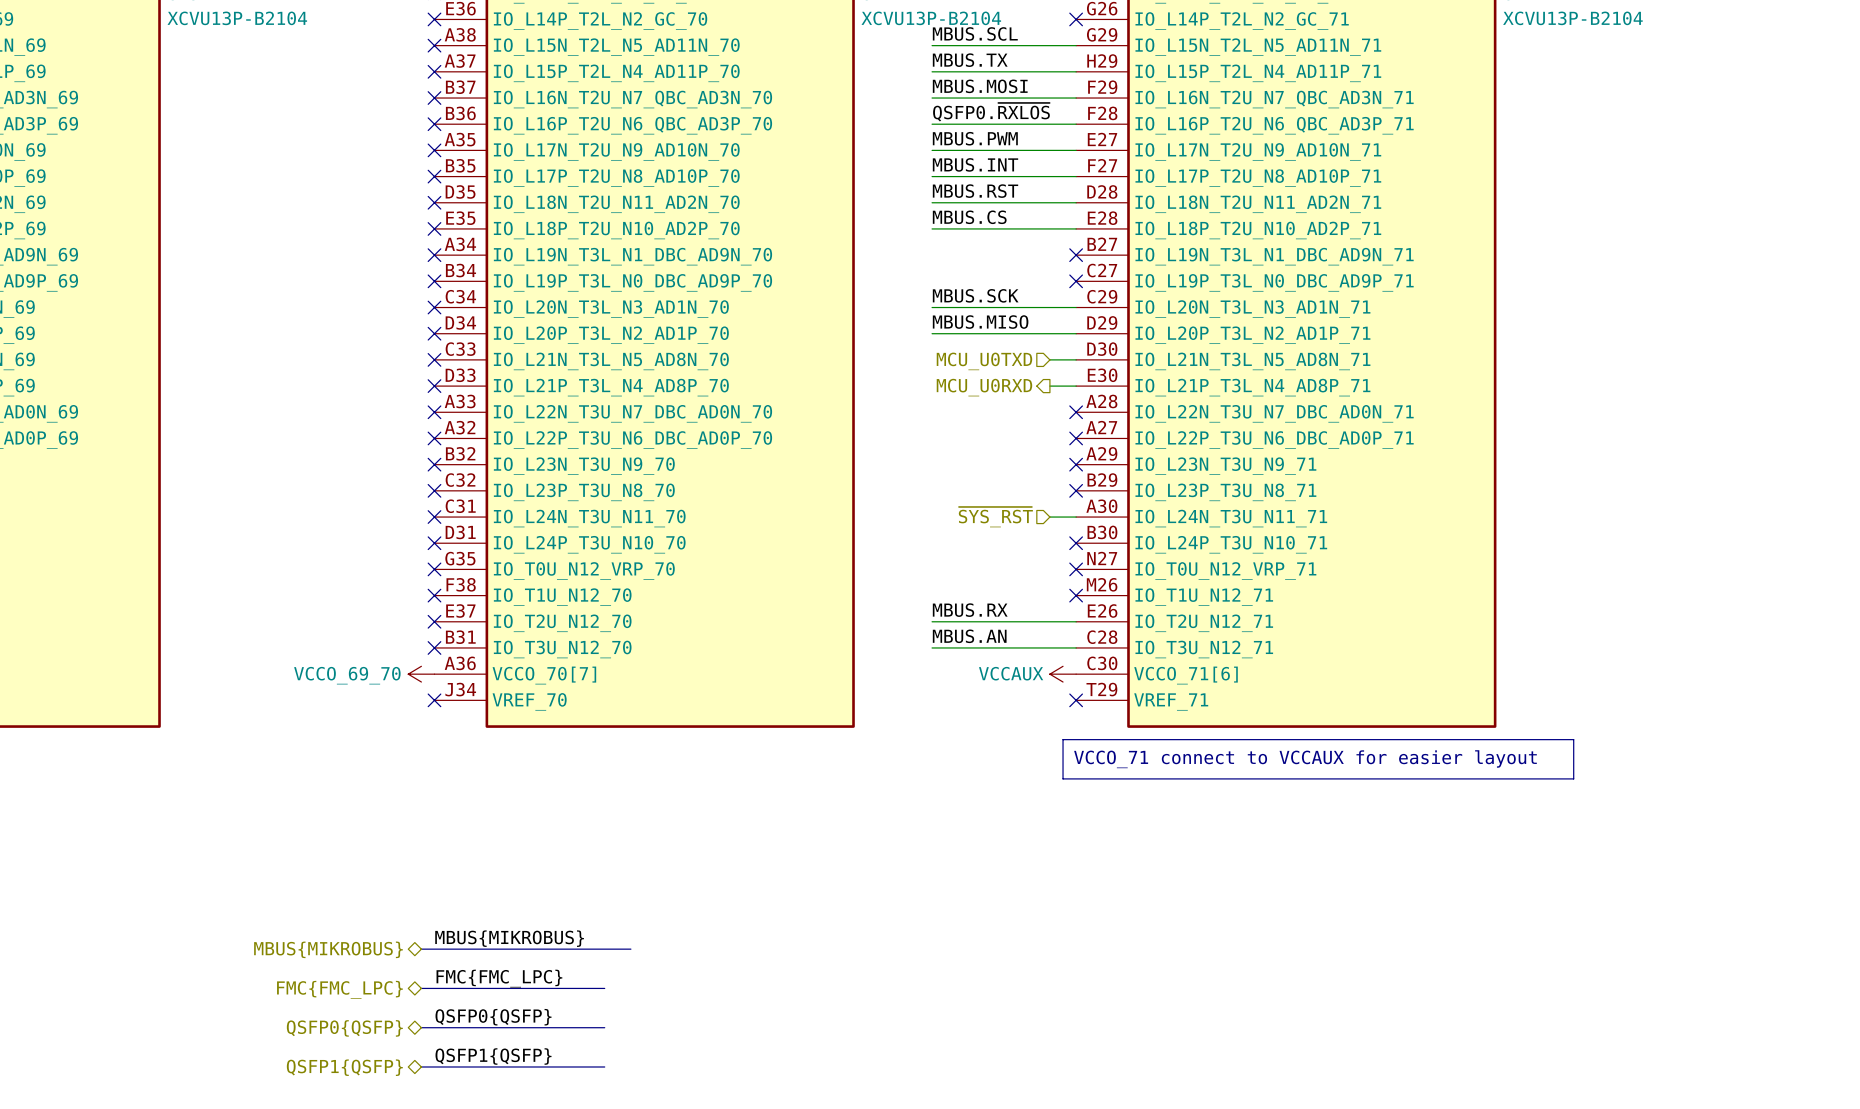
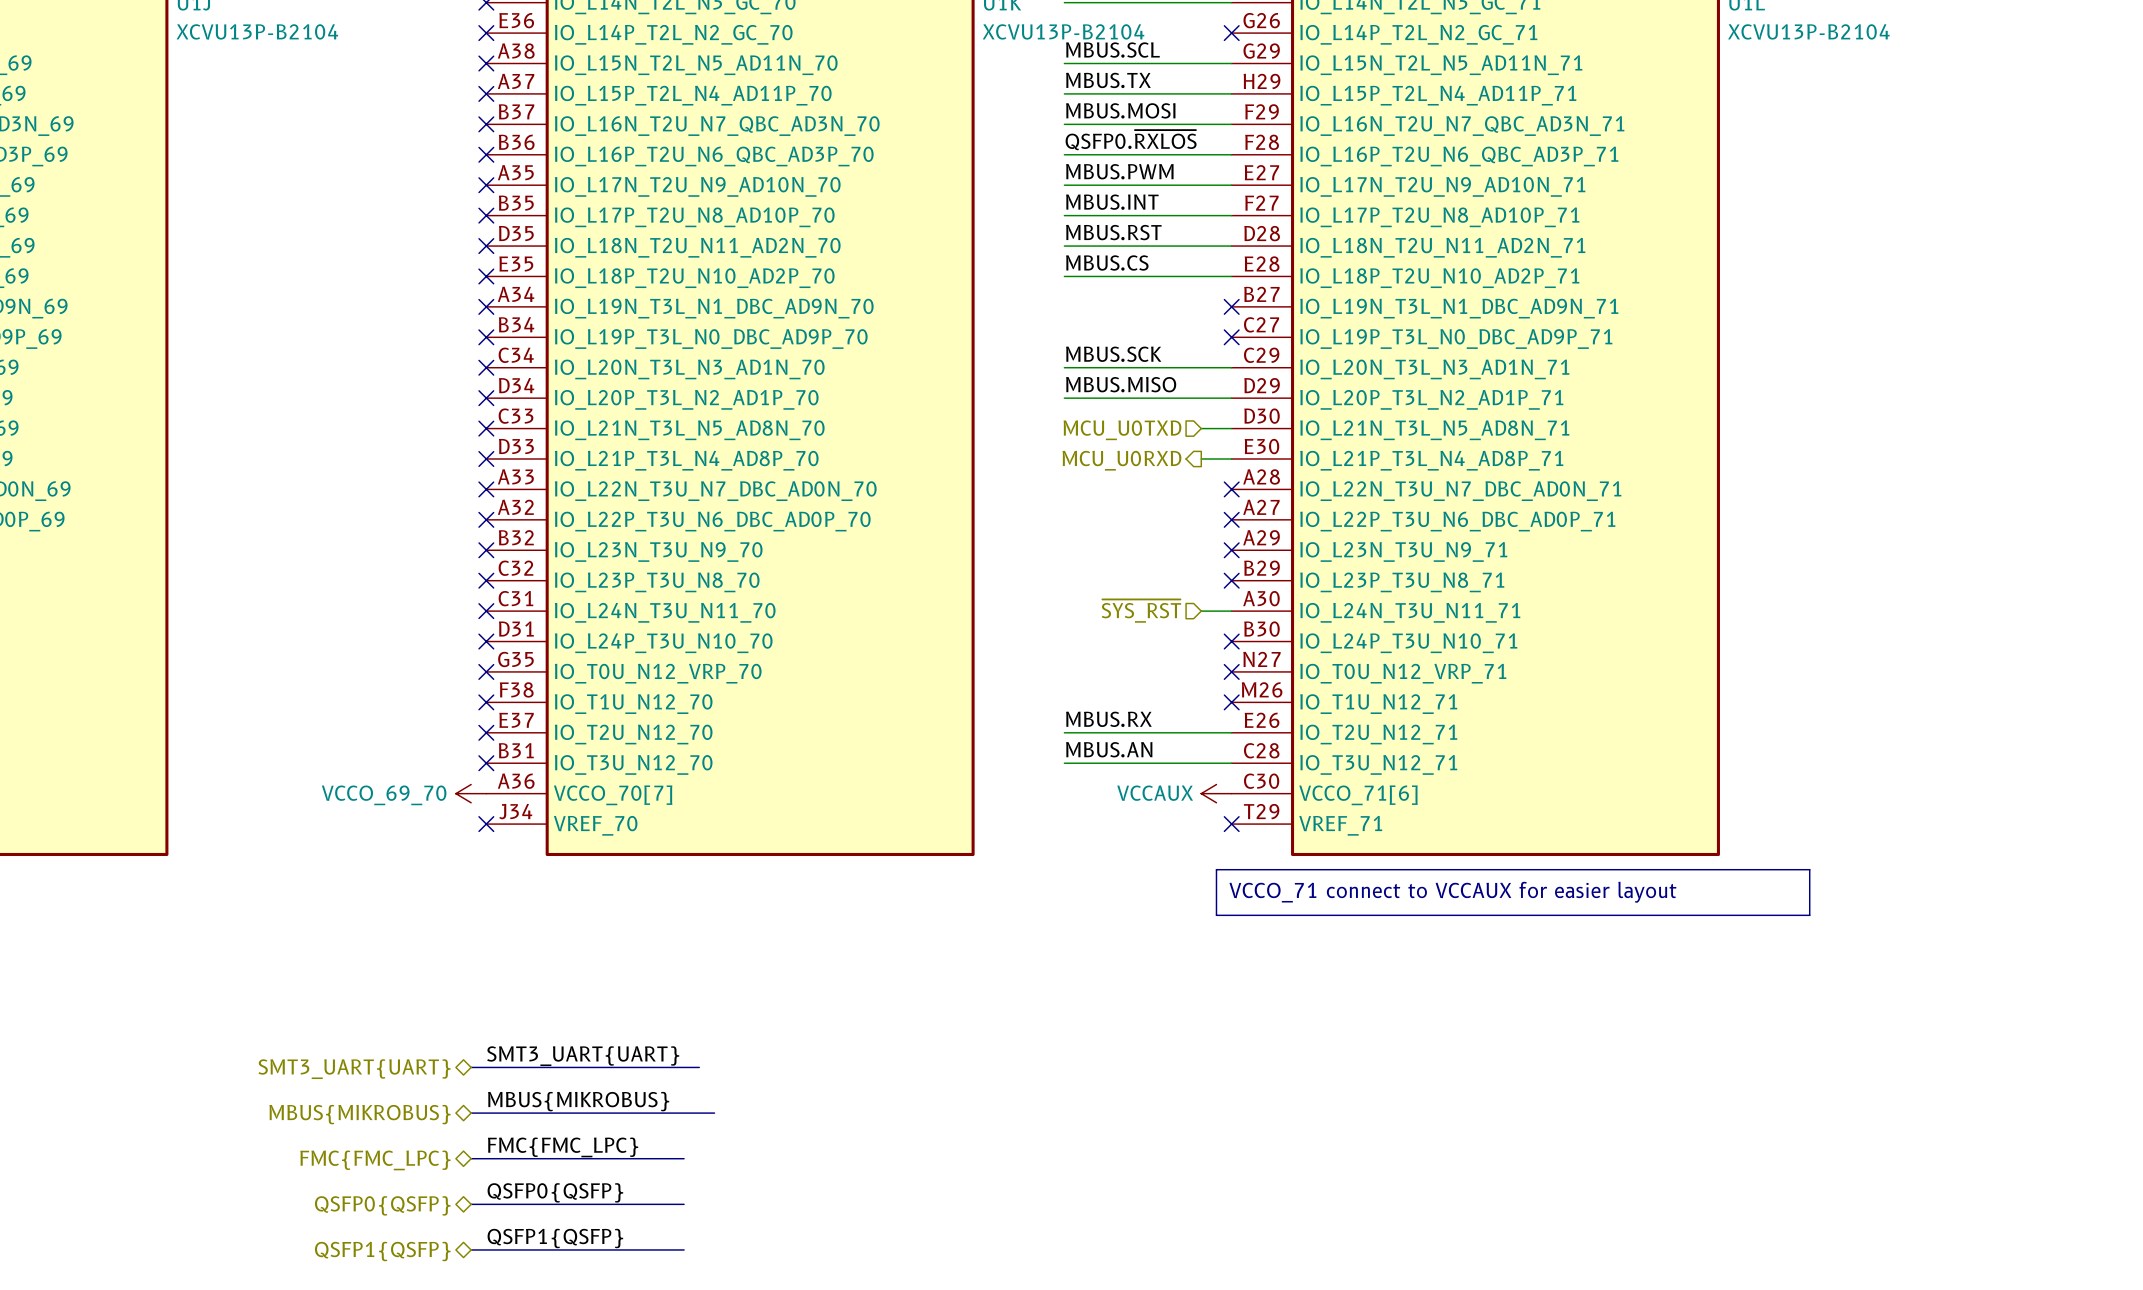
label: none -> SMT3_UART{UART} (583, 1056)
bus: none -> (471, 1067) (699, 1067)
hierarchical label: none -> SMT3_UART{UART} (354, 1069)

